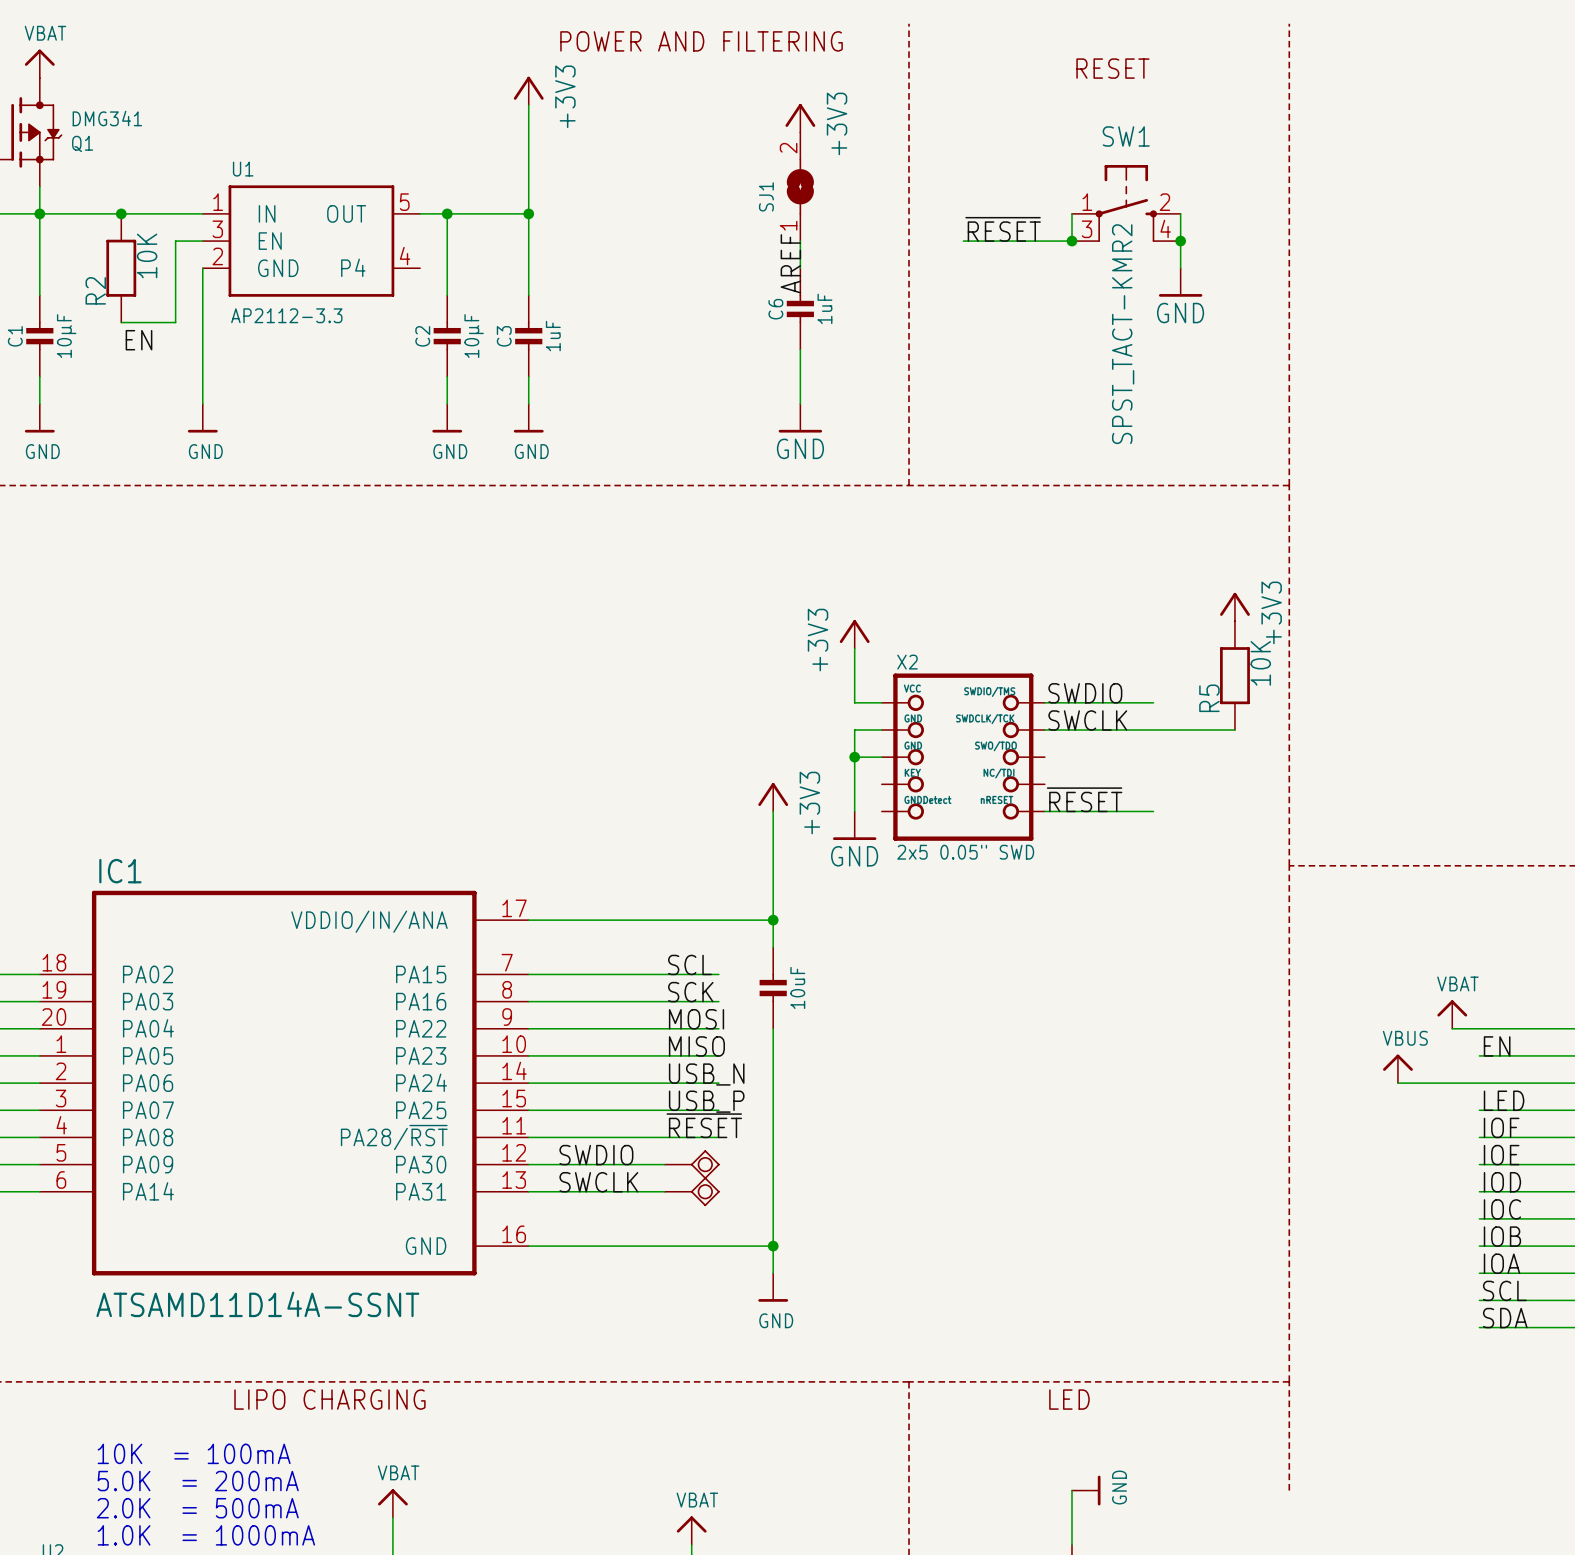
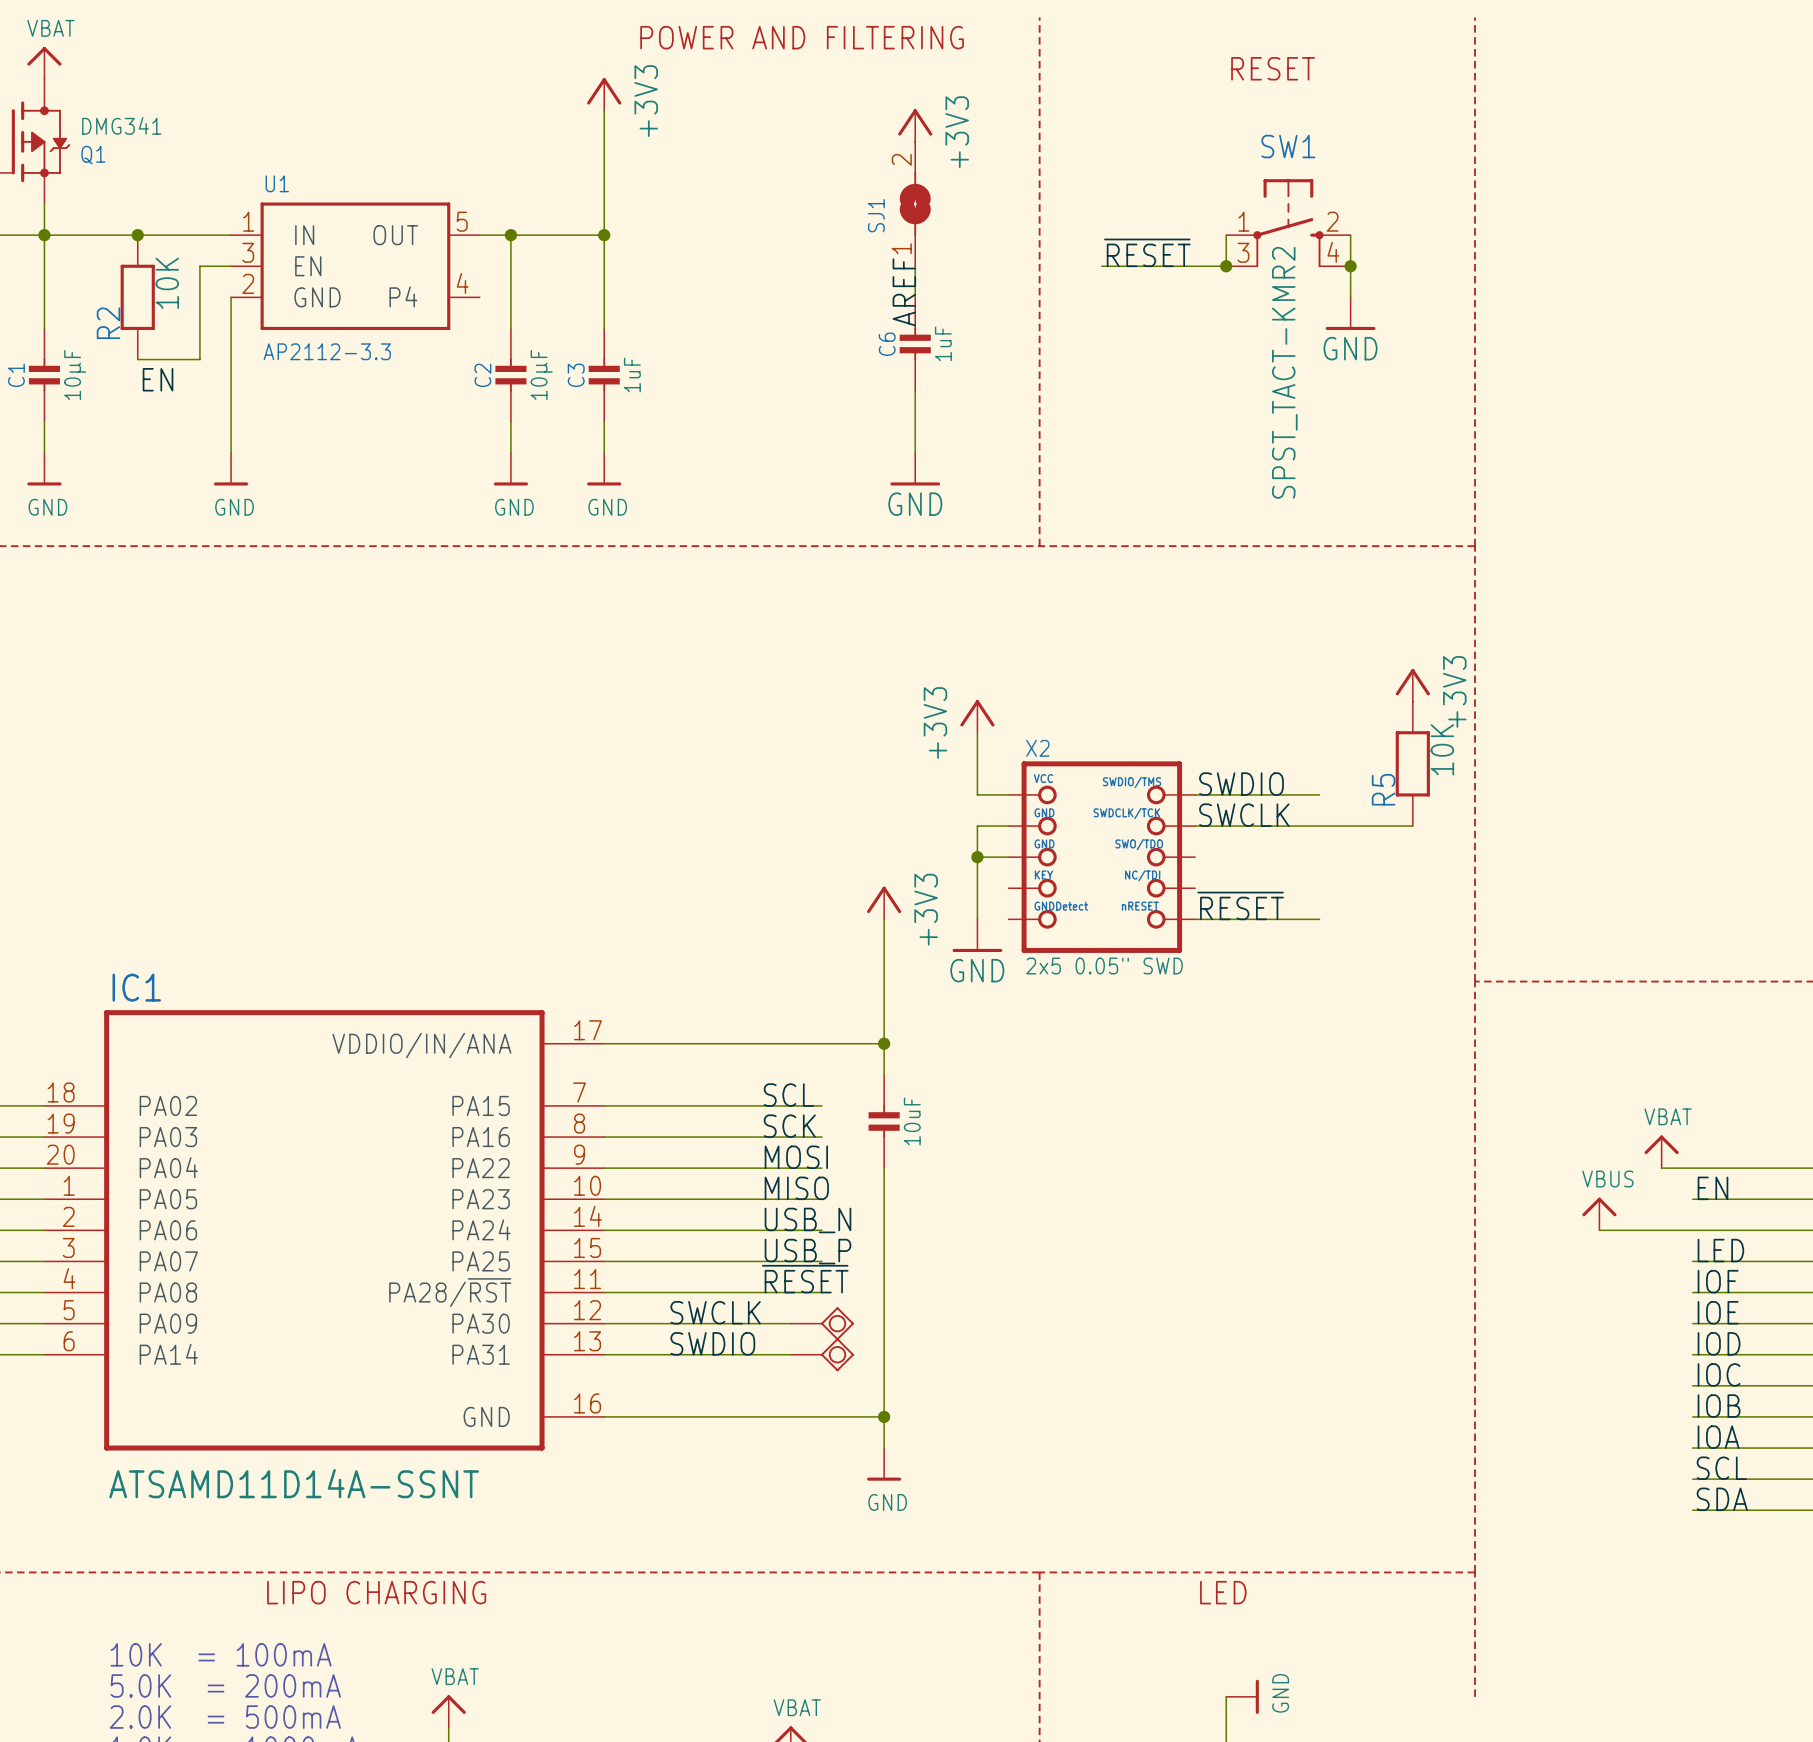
label position: SWDIO (596, 1155) -> SWDIO (712, 1343)
part: (692, 1164) -> none
part: none -> (822, 1323)
label position: SWCLK (598, 1182) -> SWCLK (715, 1312)
part: (692, 1191) -> none
part: none -> (822, 1354)

